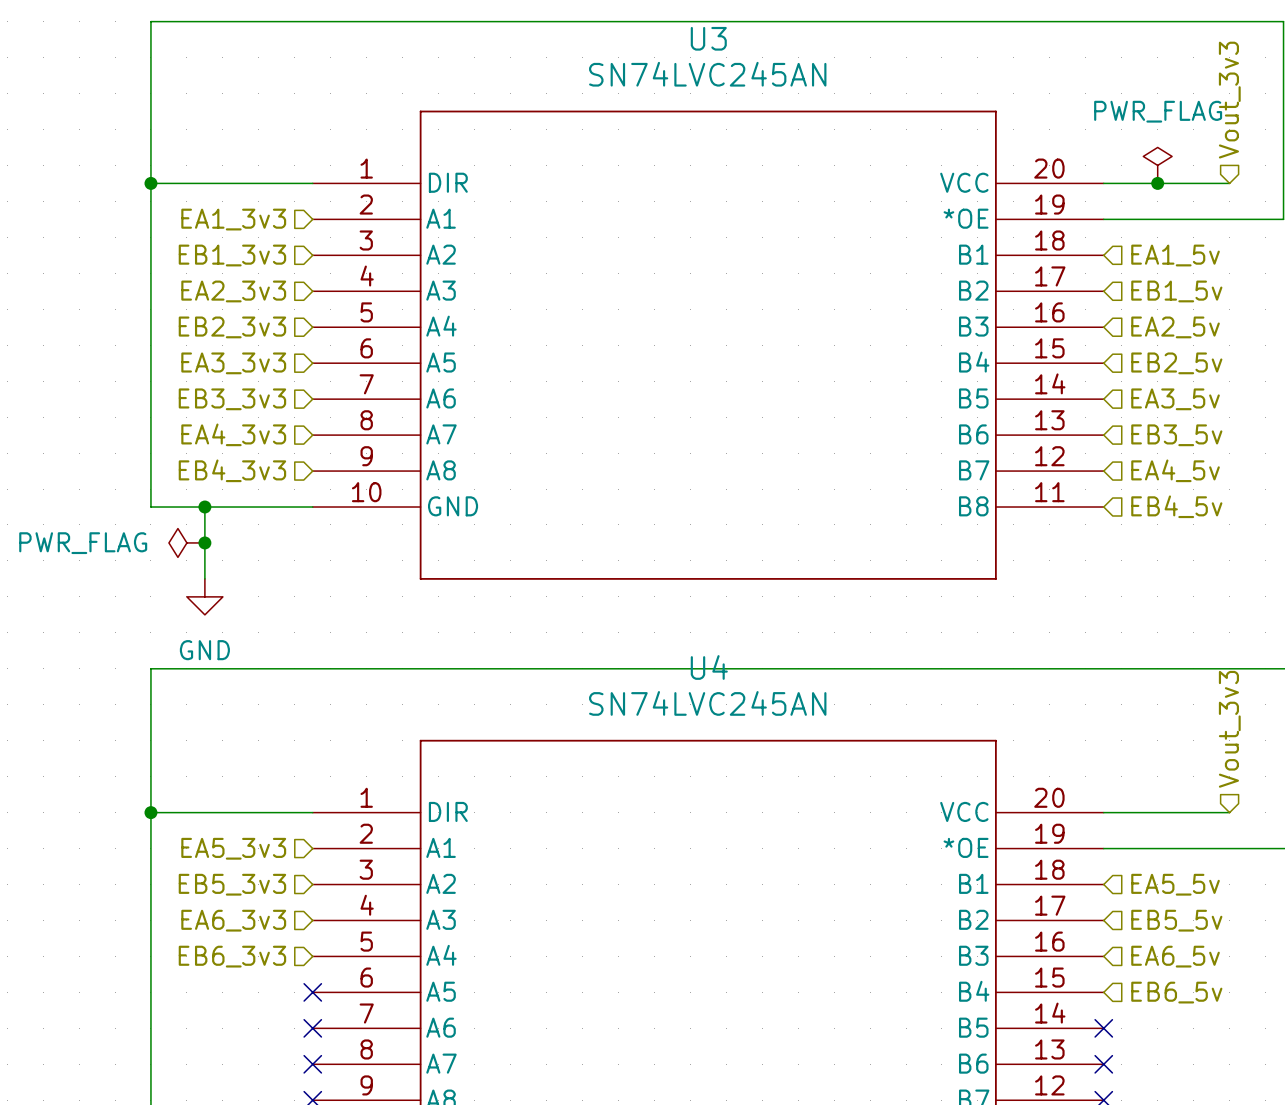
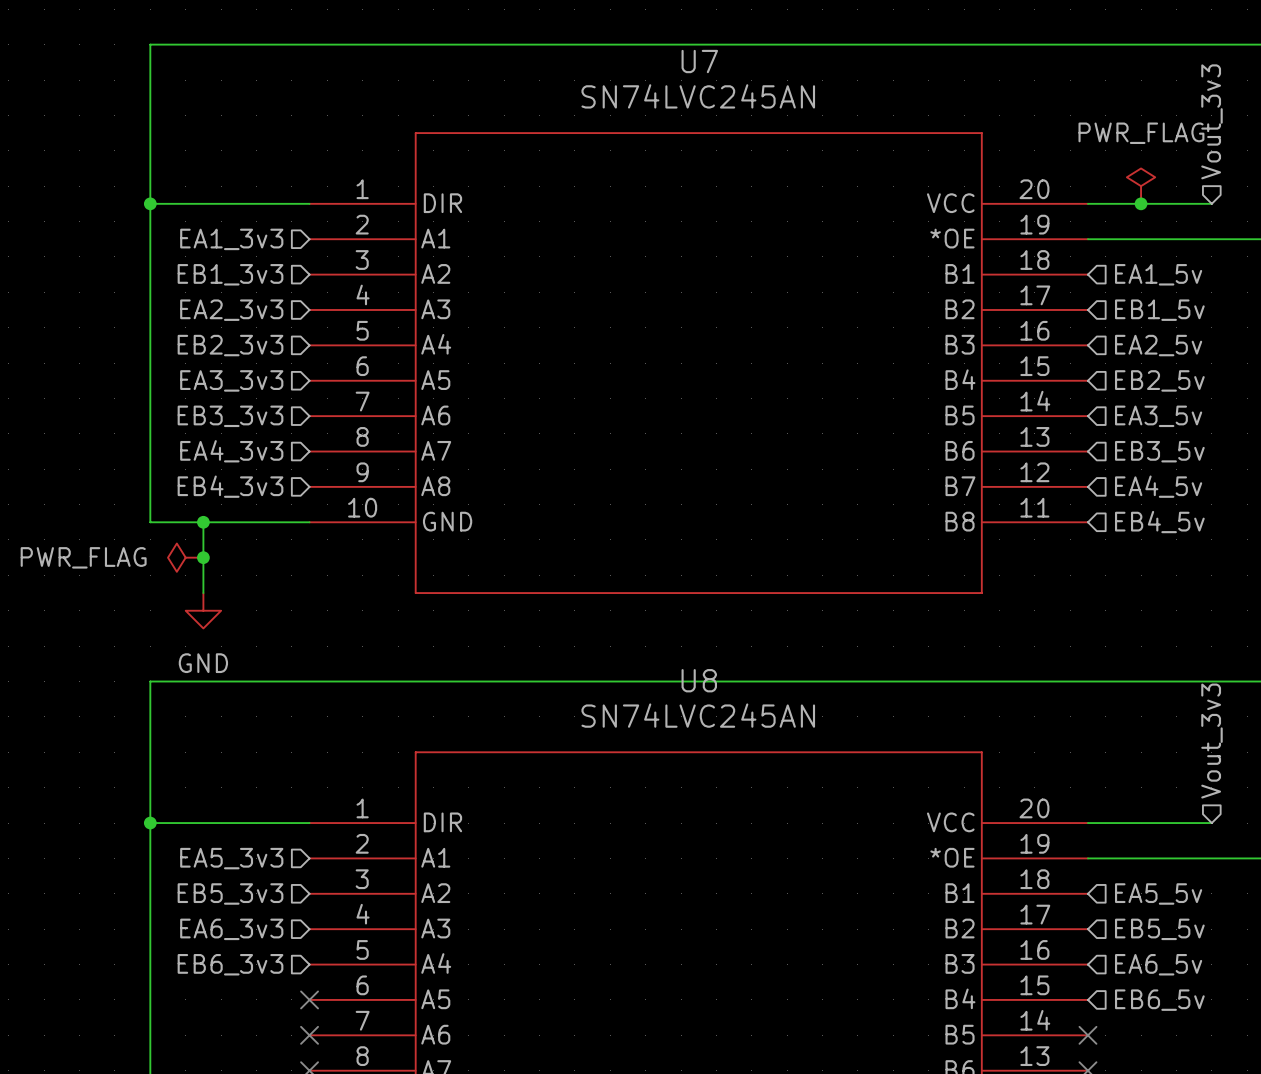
U3 name: U3 (708, 38) -> U7 (699, 61)
U4 name: U4 (709, 667) -> U8 (699, 680)

